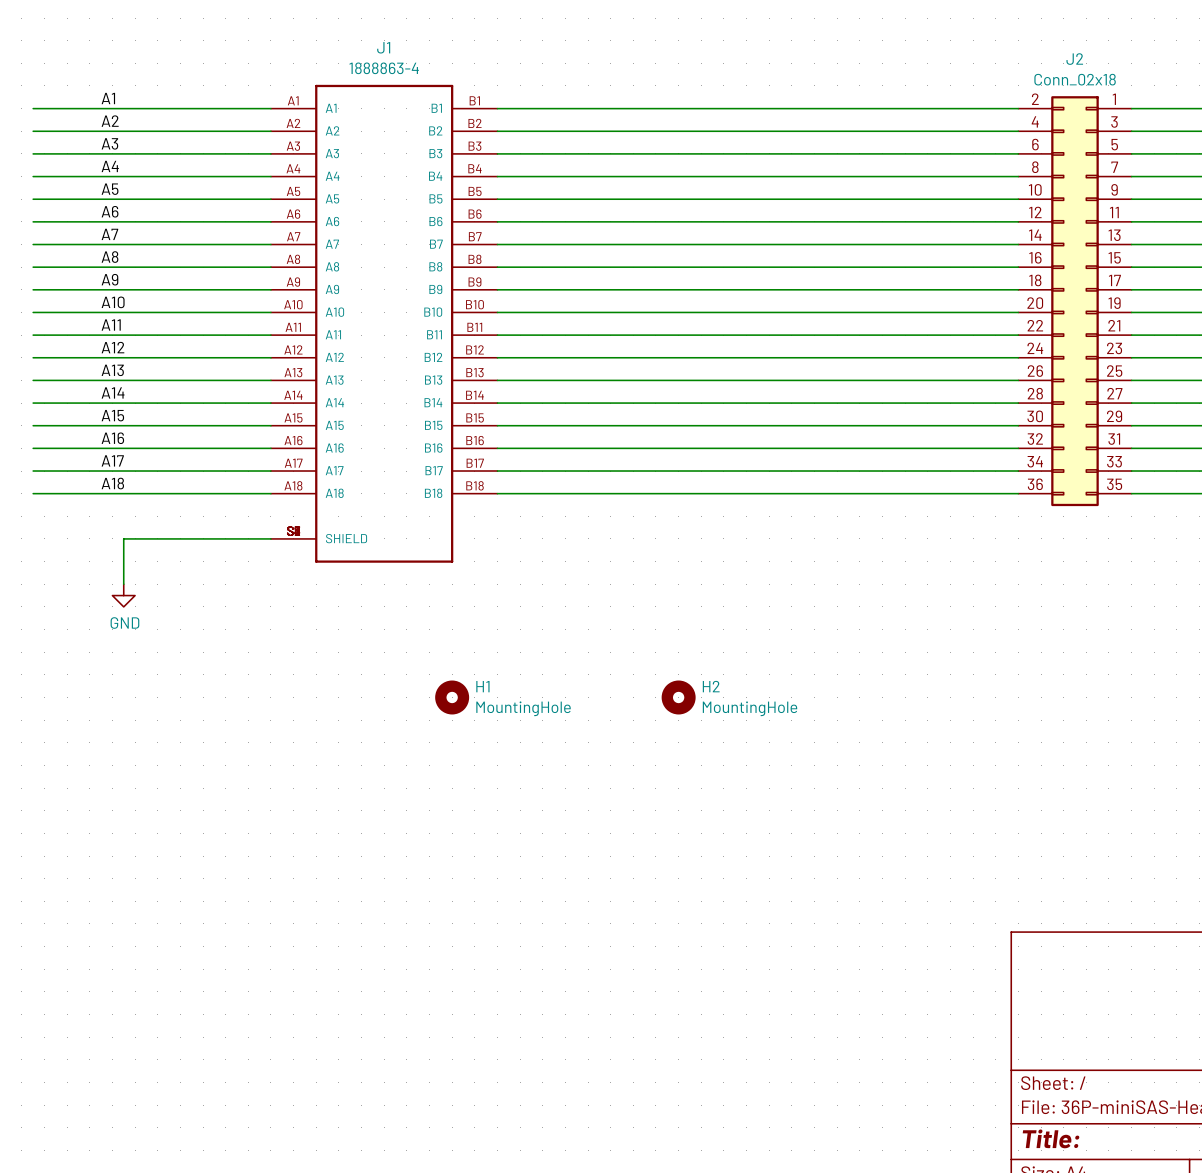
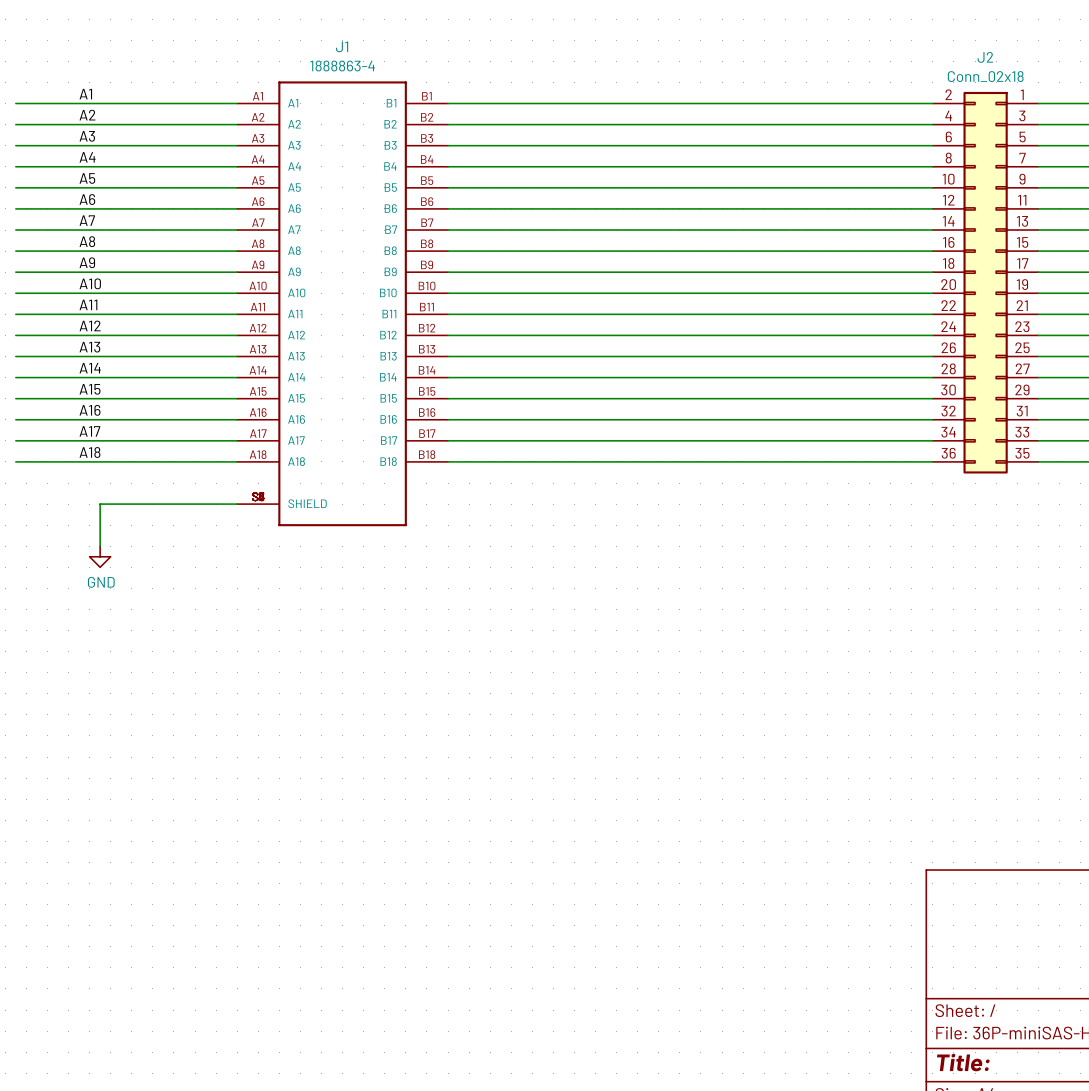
H1: MountingHole (452, 697) -> none
H2: MountingHole (678, 697) -> none

